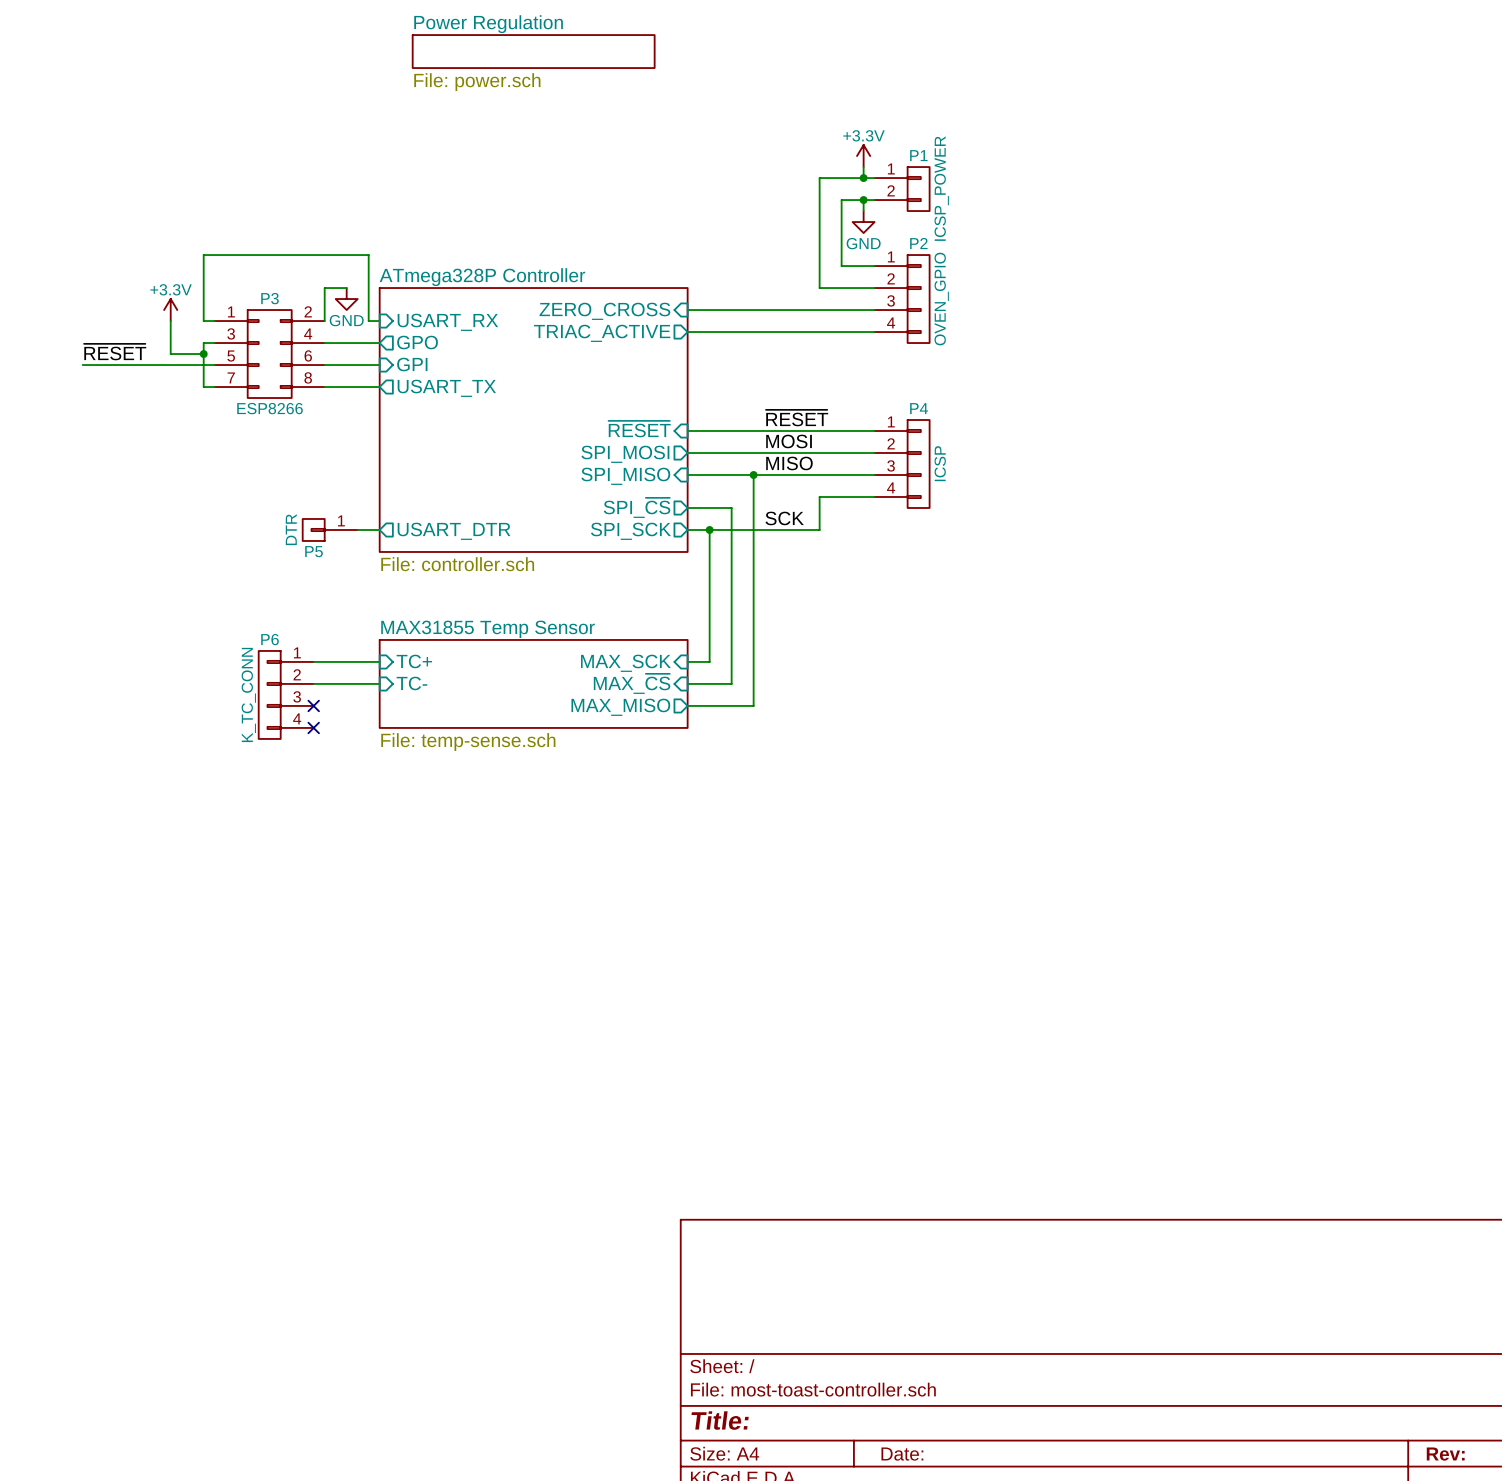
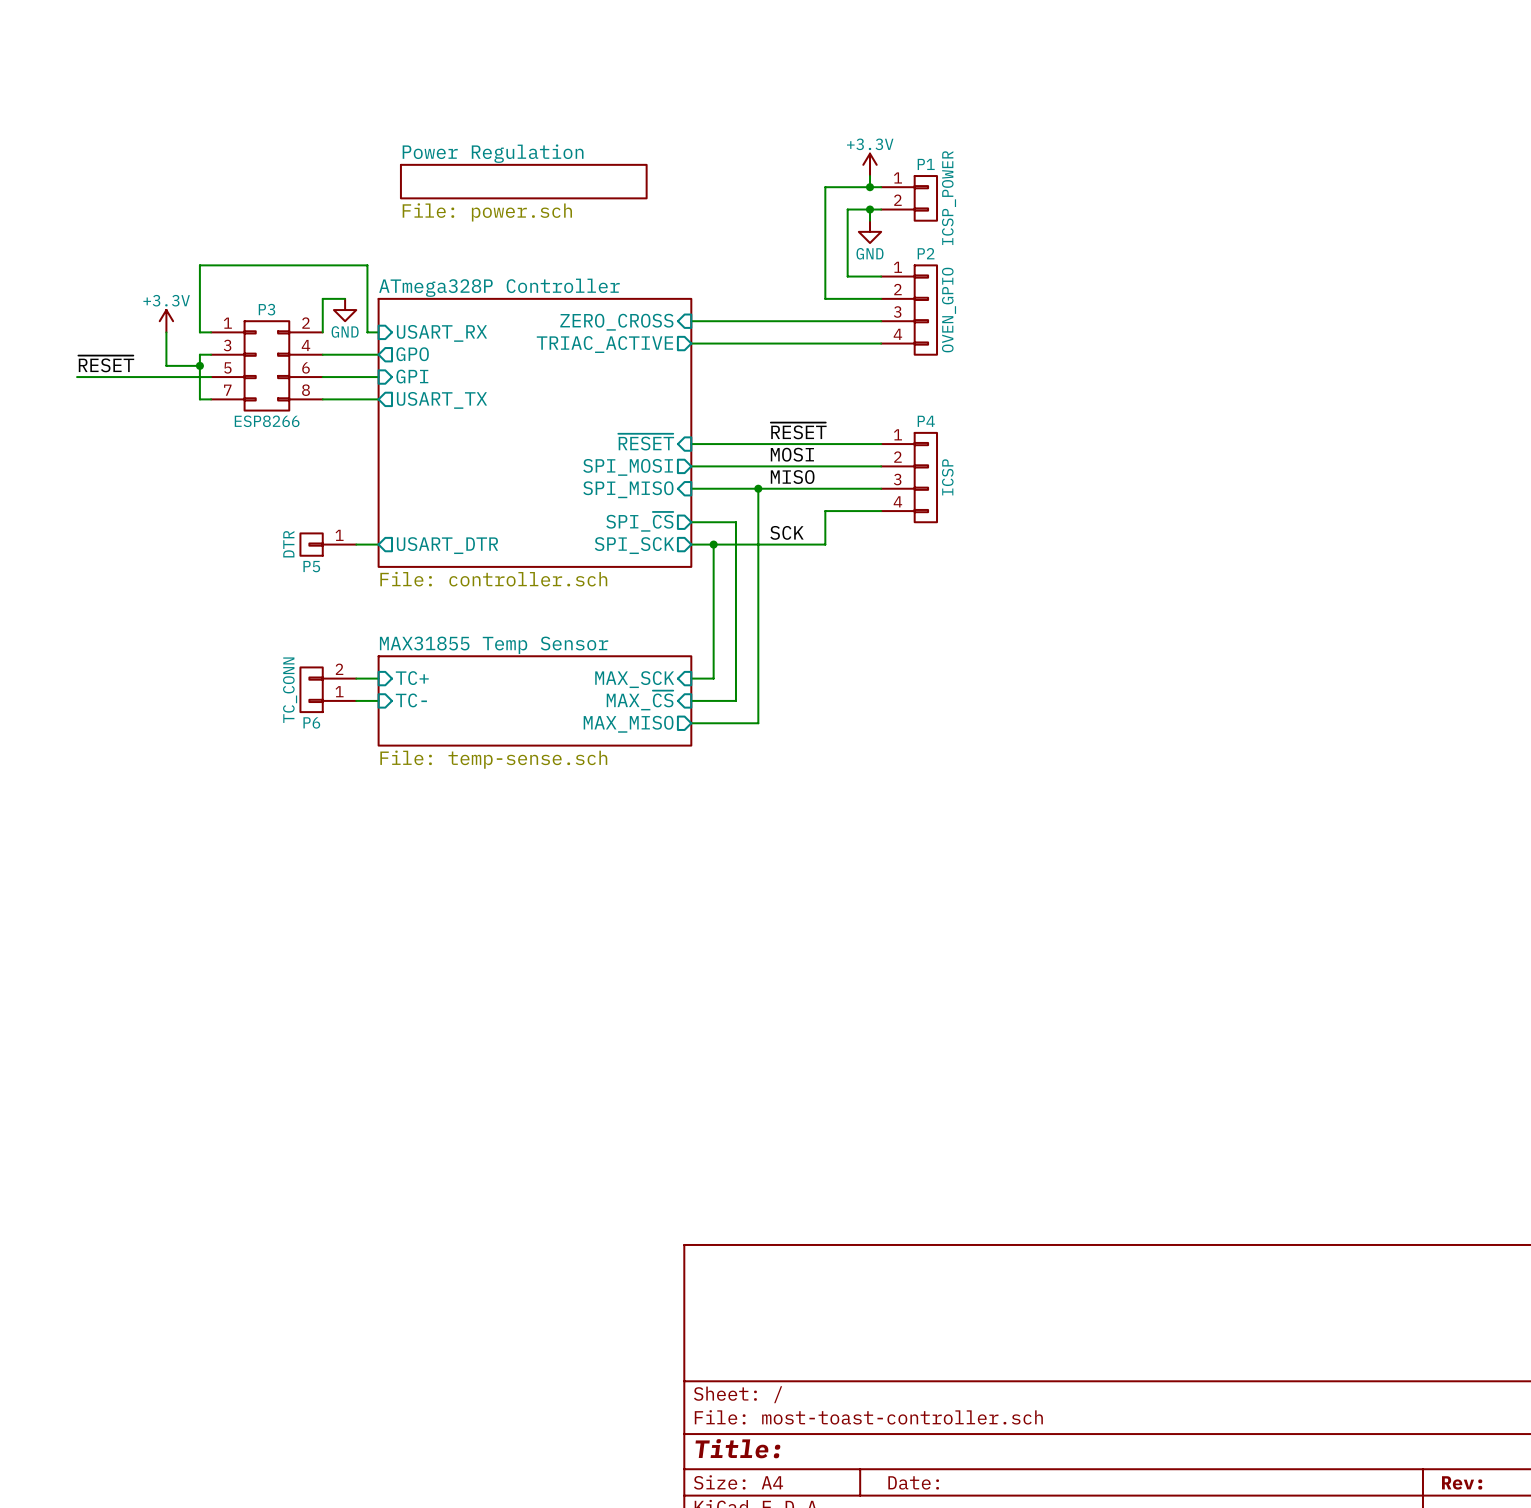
sheet Power Regulation position: (533, 51) -> (523, 181)
P6 name position: P6 (270, 639) -> P6 (311, 722)
P6 symbol: [258, 650, 314, 739] -> [300, 667, 357, 713]
P6 value: K_TC_CONN (248, 694) -> TC_CONN (290, 690)
no-connect mark: (313, 705) -> none
no-connect mark: (313, 727) -> none

